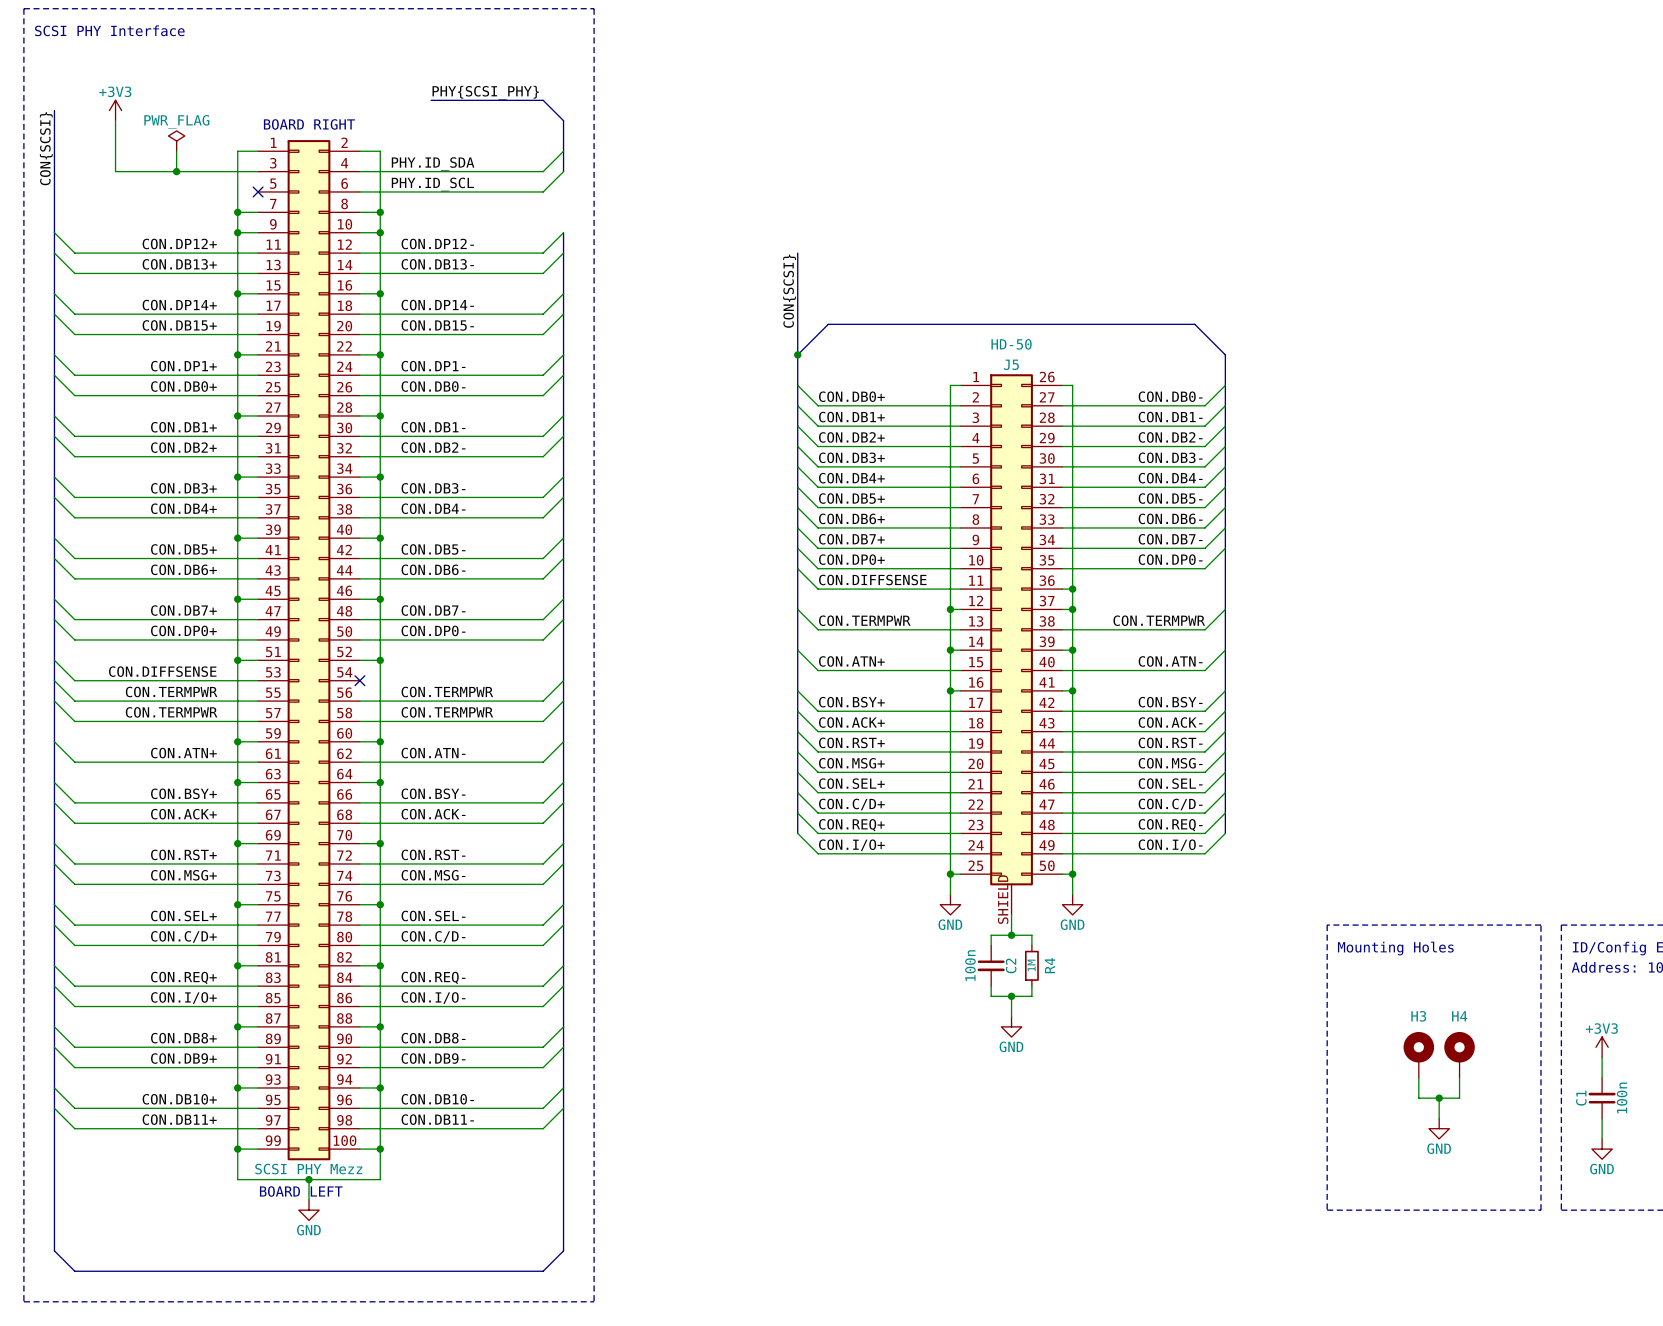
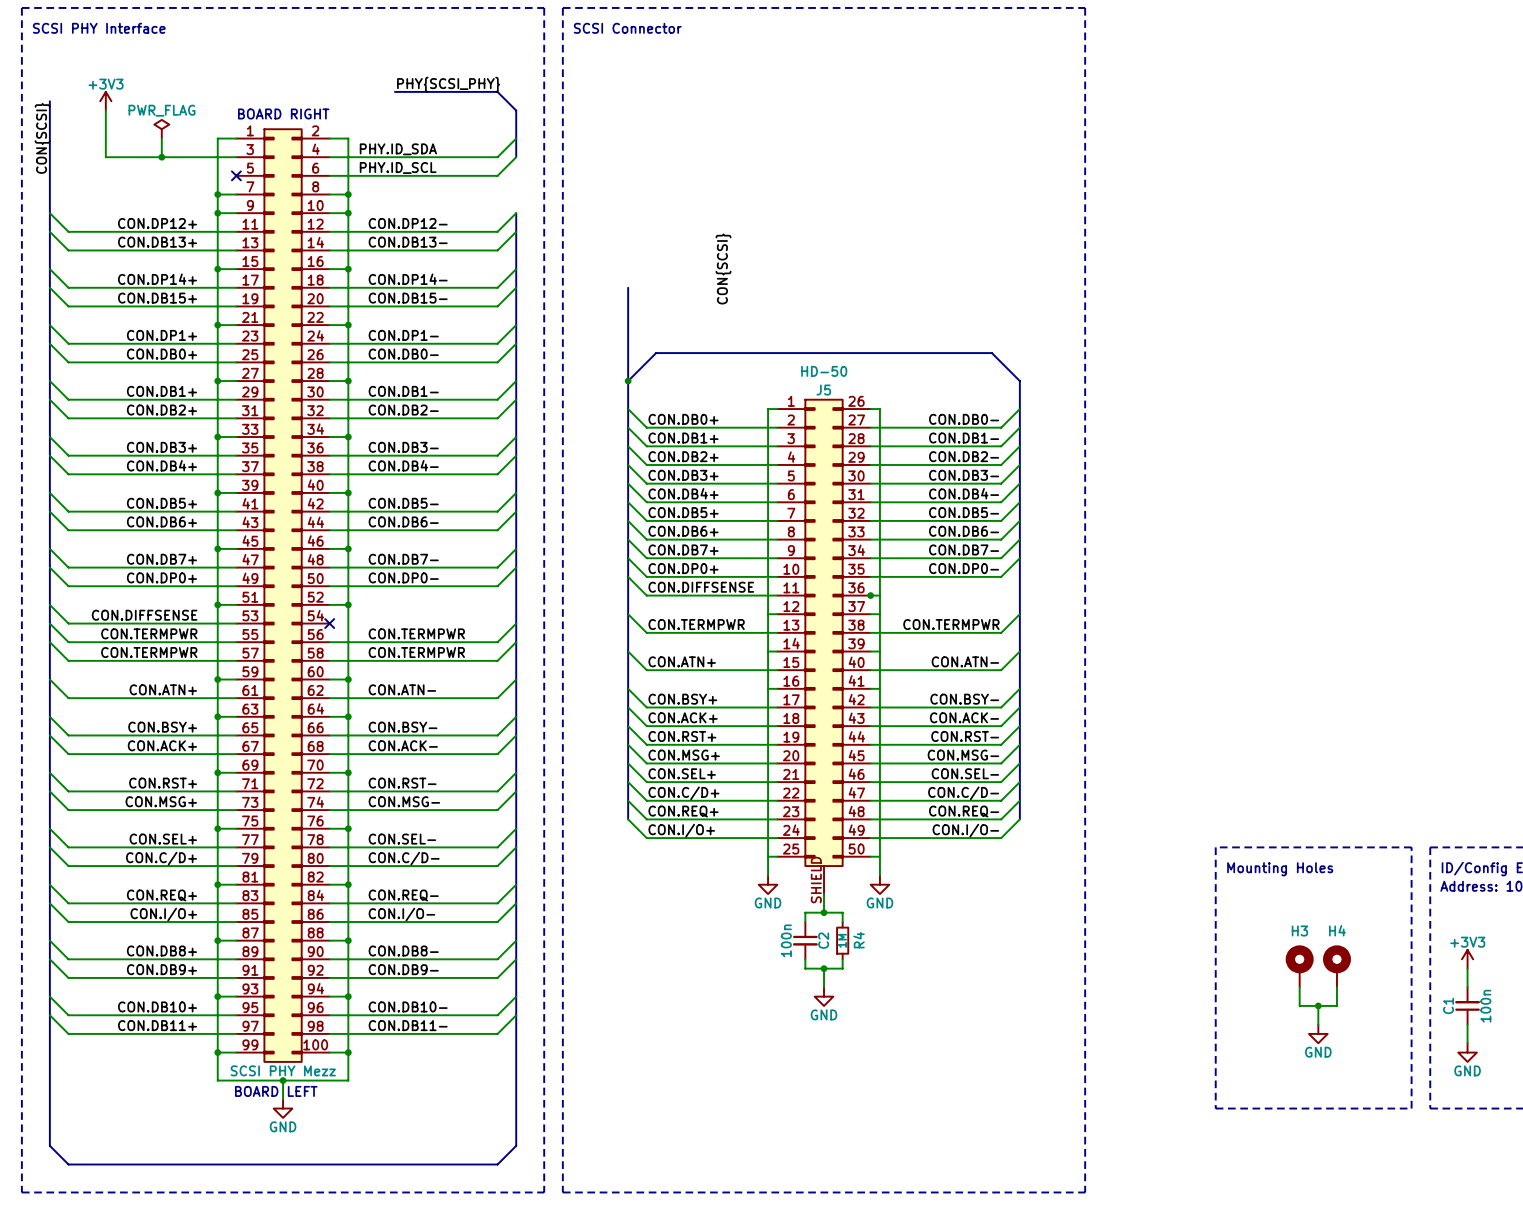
line: none -> (562, 7) (1085, 7) (1085, 1192) (562, 1192) (562, 7)
text: none -> SCSI Connector (627, 28)
bus: (797, 253) (797, 833) -> (628, 287) (628, 819)
bus: (797, 354) (828, 324) (1194, 324) (1225, 354) (1225, 833) -> (628, 381) (656, 353) (991, 353) (1019, 381) (1019, 819)
junction: (797, 354) -> none
wire: (797, 385) (818, 405) (960, 405) -> none
wire: (960, 385) (950, 385) (950, 894) -> (1019, 800) (1001, 819) (870, 819)
wire: (1062, 385) (1072, 385) (1072, 894) -> none
wire: (1225, 385) (1205, 405) (1062, 405) -> none
label position: CON.DB0+ (851, 396) -> CON.DB0+ (683, 419)
label position: CON.DB0- (1170, 396) -> CON.DB0- (964, 419)
wire: (797, 405) (818, 426) (960, 426) -> none
wire: (1225, 405) (1205, 426) (1062, 426) -> none
junction: none -> (628, 381)
label position: CON.DB1+ (851, 417) -> CON.DB1+ (683, 438)
label position: CON.DB1- (1170, 417) -> CON.DB1- (964, 438)
wire: (797, 426) (818, 446) (838, 446) -> (768, 875) (768, 409)
wire: (1225, 426) (1205, 446) (1062, 446) -> none
label position: CON.DB2+ (851, 437) -> CON.DB2+ (683, 456)
label position: CON.DB2- (1170, 437) -> CON.DB2- (964, 456)
wire: (797, 446) (818, 466) -> (628, 409) (646, 427) (749, 427)
wire: none -> (879, 409) (879, 875)
wire: (1225, 446) (1205, 466) (1093, 466) -> (1019, 409) (1001, 427)
label position: CON.DB3+ (851, 457) -> CON.DB3+ (683, 475)
label position: CON.DB3- (1170, 457) -> CON.DB3- (964, 475)
wire: (797, 466) (818, 487) -> (628, 427) (646, 446) (749, 446)
wire: (1225, 466) (1205, 487) (1093, 487) -> (1019, 427) (1001, 446)
label position: CON.DB4+ (851, 478) -> CON.DB4+ (683, 493)
label position: CON.DB4- (1170, 478) -> CON.DB4- (964, 493)
wire: (797, 487) (818, 507) -> (628, 446) (646, 464) (749, 464)
wire: (1225, 487) (1205, 507) (1093, 507) -> (1019, 446) (1001, 464)
label position: CON.DB5+ (851, 498) -> CON.DB5+ (683, 512)
label position: CON.DB5- (1170, 498) -> CON.DB5- (964, 512)
wire: (797, 507) (818, 527) -> (628, 464) (646, 483) (749, 483)
wire: (1225, 507) (1205, 527) (1093, 527) -> (1019, 464) (1001, 483)
label position: CON.DB6+ (851, 518) -> CON.DB6+ (683, 531)
label position: CON.DB6- (1170, 518) -> CON.DB6- (964, 531)
wire: (797, 527) (818, 548) -> (628, 483) (646, 502) (749, 502)
wire: (1225, 527) (1205, 548) (1093, 548) -> (1019, 483) (1001, 502)
label position: CON.DB7+ (851, 539) -> CON.DB7+ (683, 549)
label position: CON.DB7- (1170, 539) -> CON.DB7- (964, 549)
wire: (797, 548) (818, 568) -> (628, 502) (646, 520) (749, 520)
wire: (1225, 548) (1205, 568) (1093, 568) -> (1019, 502) (1001, 520)
label position: CON.DP0+ (851, 559) -> CON.DP0+ (683, 568)
label position: CON.DP0- (1170, 559) -> CON.DP0- (964, 568)
wire: (797, 568) (818, 589) -> (628, 520) (646, 539) (749, 539)
wire: none -> (1019, 520) (1001, 539) (982, 539)
label position: CON.DIFFSENSE (872, 579) -> CON.DIFFSENSE (701, 587)
wire: none -> (628, 539) (646, 558) (777, 558)
junction: (1072, 589) -> none
wire: none -> (1019, 539) (1001, 558) (982, 558)
wire: (797, 609) (818, 629) -> (628, 558) (646, 576) (749, 576)
junction: (950, 609) -> none
junction: (1072, 609) -> none
wire: (1225, 609) (1205, 629) (1093, 629) -> (1019, 558) (1001, 576)
label position: CON.TERMPWR (864, 620) -> CON.TERMPWR (696, 624)
label position: CON.TERMPWR (1159, 620) -> CON.TERMPWR (951, 624)
wire: none -> (628, 576) (646, 595) (777, 595)
J5 position: (1011, 644) -> (824, 646)
wire: (797, 650) (818, 670) (838, 670) -> none
wire: (1062, 650) (1072, 650) -> none
junction: (1072, 650) -> none
wire: (1225, 650) (1205, 670) (1062, 670) -> none
label position: CON.ATN+ (851, 661) -> CON.ATN+ (682, 661)
label position: CON.ATN- (1170, 661) -> CON.ATN- (965, 661)
wire: none -> (628, 614) (646, 632) (777, 632)
wire: none -> (1019, 614) (1001, 632) (982, 632)
wire: (797, 690) (818, 711) (838, 711) -> none
junction: (950, 690) -> none
junction: (1072, 690) -> none
wire: (1225, 690) (1205, 711) (1062, 711) -> none
label position: CON.BSY+ (851, 702) -> CON.BSY+ (682, 699)
label position: CON.BSY- (1170, 702) -> CON.BSY- (964, 699)
wire: (797, 711) (818, 731) -> (628, 651) (646, 670) (749, 670)
wire: (1225, 711) (1205, 731) (1093, 731) -> (1019, 651) (1001, 670)
label position: CON.ACK+ (851, 722) -> CON.ACK+ (683, 717)
label position: CON.ACK- (1170, 722) -> CON.ACK- (964, 717)
wire: (797, 731) (818, 751) (838, 751) -> none
wire: (1225, 731) (1205, 751) (1062, 751) -> (1019, 819) (1001, 838) (870, 838)
label position: CON.RST+ (851, 742) -> CON.RST+ (682, 736)
label position: CON.RST- (1170, 742) -> CON.RST- (965, 736)
wire: (797, 751) (818, 772) -> (628, 688) (646, 707) (749, 707)
wire: (1225, 751) (1205, 772) (1093, 772) -> (1019, 688) (1001, 707)
label position: CON.MSG+ (851, 763) -> CON.MSG+ (684, 755)
label position: CON.MSG- (1170, 763) -> CON.MSG- (963, 755)
wire: (797, 772) (818, 792) -> (628, 707) (646, 726) (749, 726)
wire: (1225, 772) (1205, 792) (1093, 792) -> (1019, 707) (1001, 726)
label position: CON.SEL+ (851, 783) -> CON.SEL+ (682, 773)
label position: CON.SEL- (1170, 783) -> CON.SEL- (965, 773)
wire: (797, 792) (818, 813) -> (628, 726) (646, 744) (749, 744)
wire: (1225, 792) (1205, 813) (1093, 813) -> (1019, 726) (1001, 744)
label position: CON.C/D+ (851, 804) -> CON.C/D+ (683, 793)
label position: CON.C/D- (1170, 804) -> CON.C/D- (963, 793)
wire: (797, 813) (818, 833) -> (628, 744) (646, 763) (749, 763)
wire: (1225, 813) (1205, 833) (1093, 833) -> (1019, 744) (1001, 763)
label position: CON.REQ+ (851, 825) -> CON.REQ+ (683, 811)
label position: CON.REQ- (1170, 825) -> CON.REQ- (964, 811)
wire: (797, 833) (818, 853) -> (628, 763) (646, 782) (749, 782)
wire: (1225, 833) (1205, 853) (1093, 853) -> (1019, 763) (1001, 782)
label position: CON.I/O+ (851, 845) -> CON.I/O+ (681, 830)
label position: CON.I/O- (1170, 845) -> CON.I/O- (965, 830)
wire: none -> (628, 782) (646, 800) (777, 800)
wire: none -> (1019, 782) (1001, 800) (982, 800)
wire: none -> (628, 800) (646, 819) (777, 819)
junction: (950, 874) -> none
junction: (1072, 874) -> none
wire: none -> (628, 819) (646, 838) (777, 838)
power symbol: GND (950, 904) -> none
power symbol: GND (1072, 904) -> none
wire: (1011, 914) (1011, 935) -> (824, 894) (824, 912)
wire: none -> (768, 856) (777, 856)
wire: none -> (870, 856) (879, 856)
junction: (1011, 935) -> none
wire: (991, 945) (991, 935) (1031, 935) (1031, 945) -> (805, 922) (805, 912) (842, 912) (842, 922)
power symbol: none -> GND (768, 884)
power symbol: none -> GND (879, 884)
C2 position: (991, 965) -> (805, 940)
R4 position: (1031, 965) -> (842, 940)
wire: (991, 986) (991, 996) (1031, 996) (1031, 986) -> (805, 959) (805, 968) (842, 968) (842, 959)
junction: none -> (824, 912)
wire: (1011, 996) (1011, 1016) -> (824, 968) (824, 987)
junction: (1011, 996) -> none
power symbol: GND (1011, 1026) -> none
junction: none -> (824, 968)
power symbol: none -> GND (824, 996)

